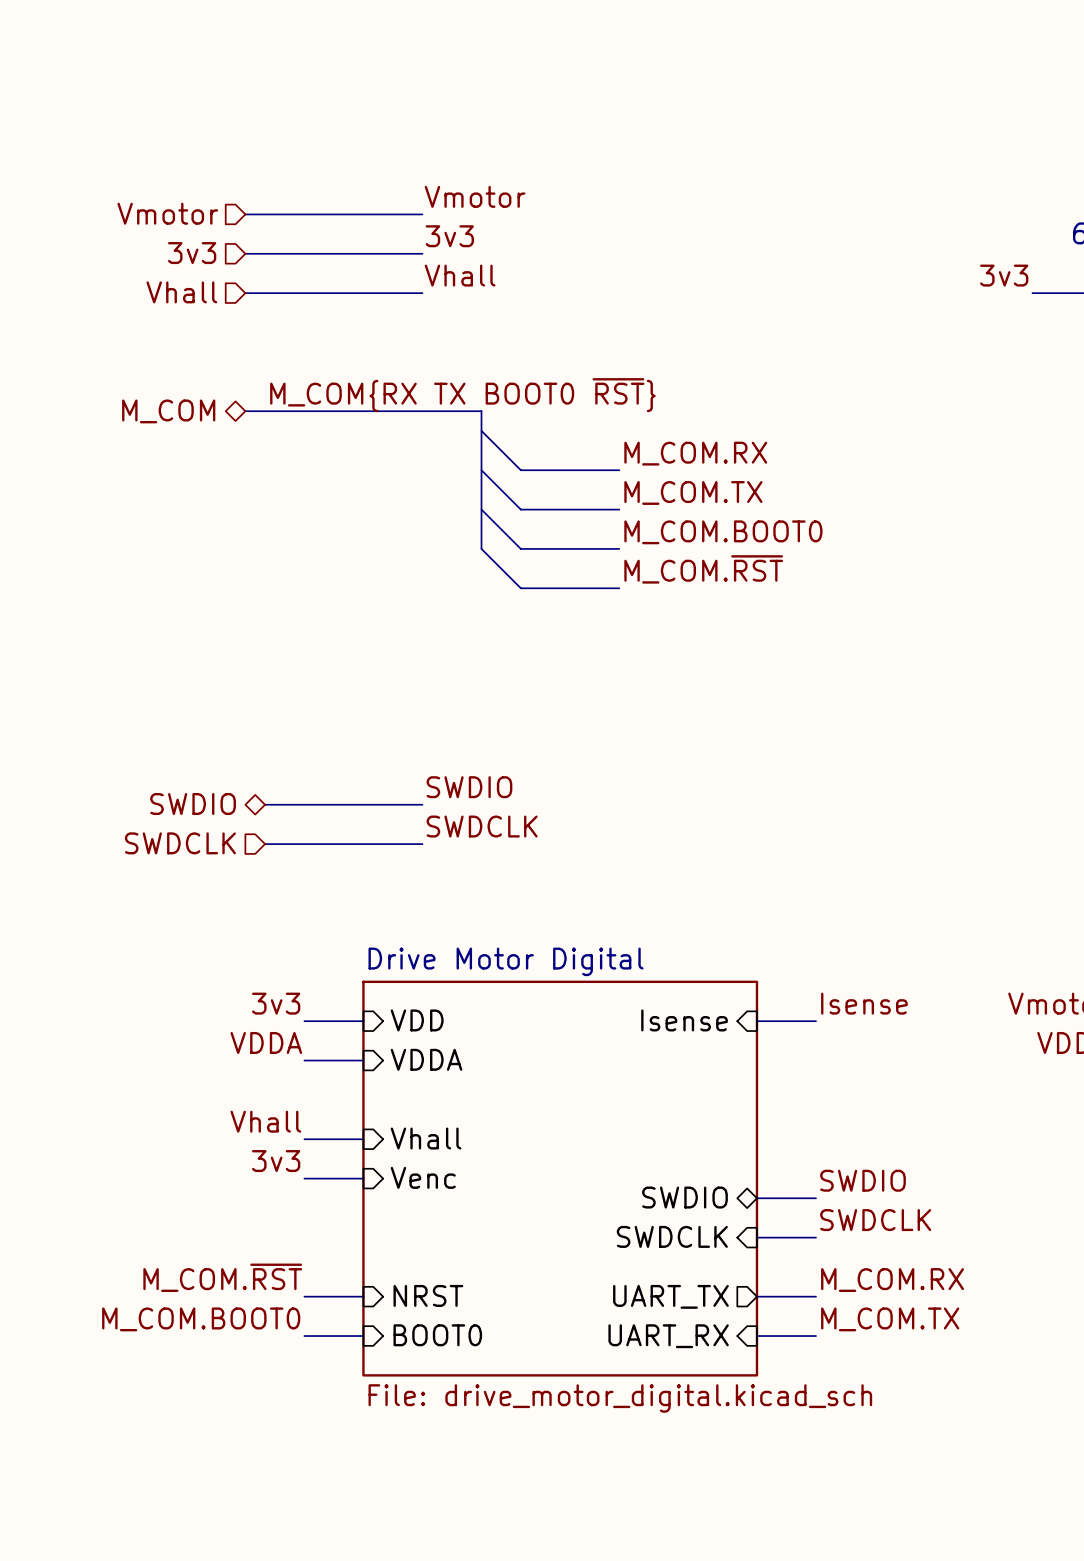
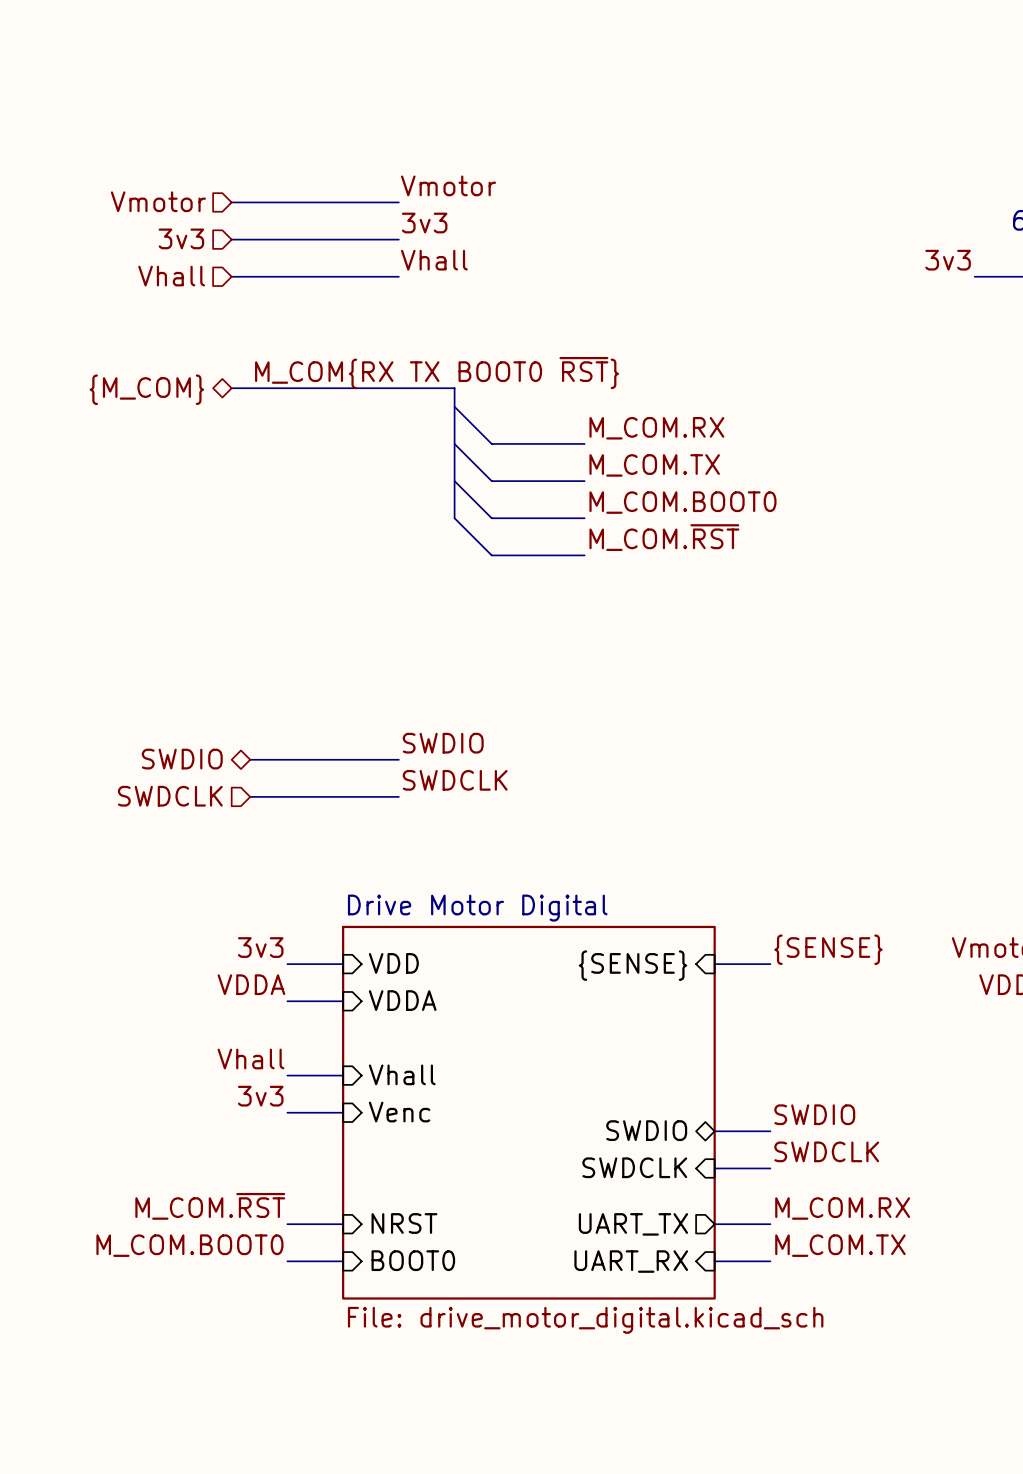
hierarchical label: M_COM (168, 411) -> {M_COM} (146, 389)
label: Isense (864, 1003) -> {SENSE} (828, 949)
sheet pin: Isense (684, 1020) -> {SENSE} (632, 965)

